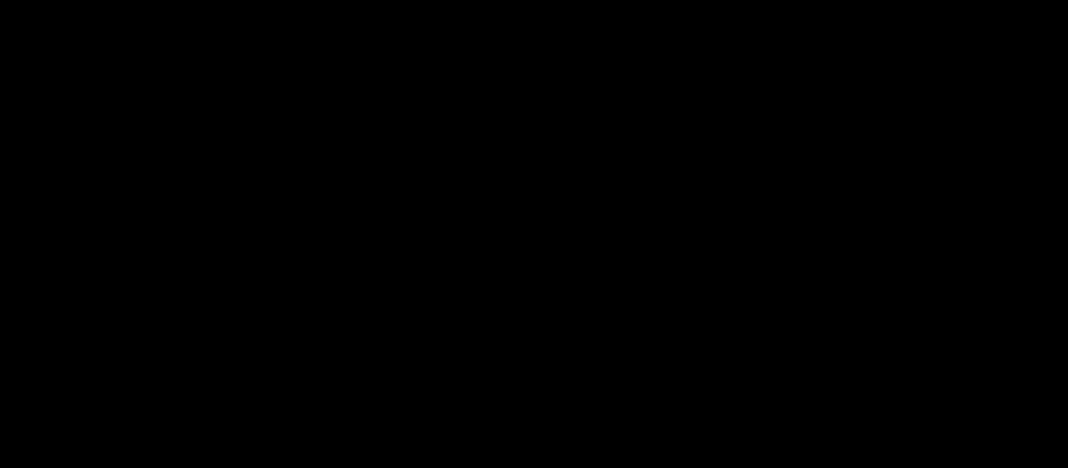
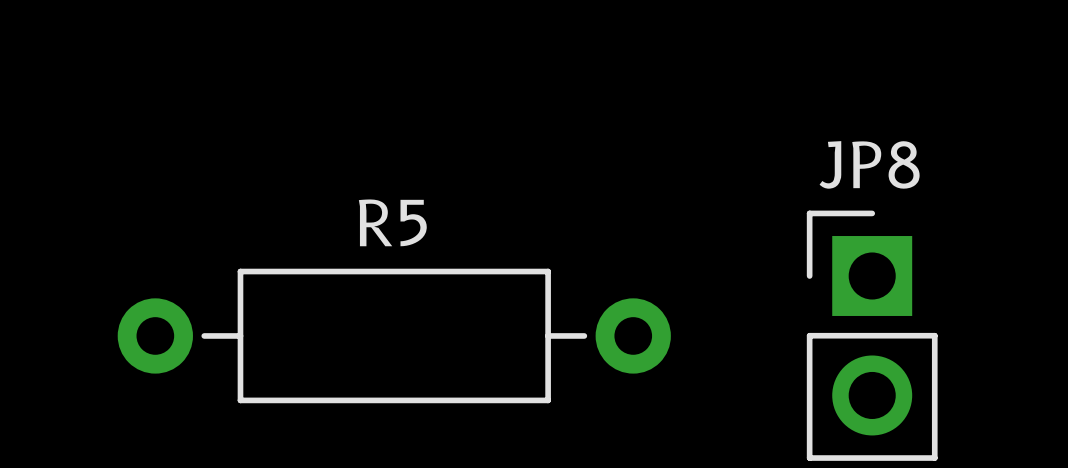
R5: none -> (394, 335)
JP8: none -> (872, 335)

